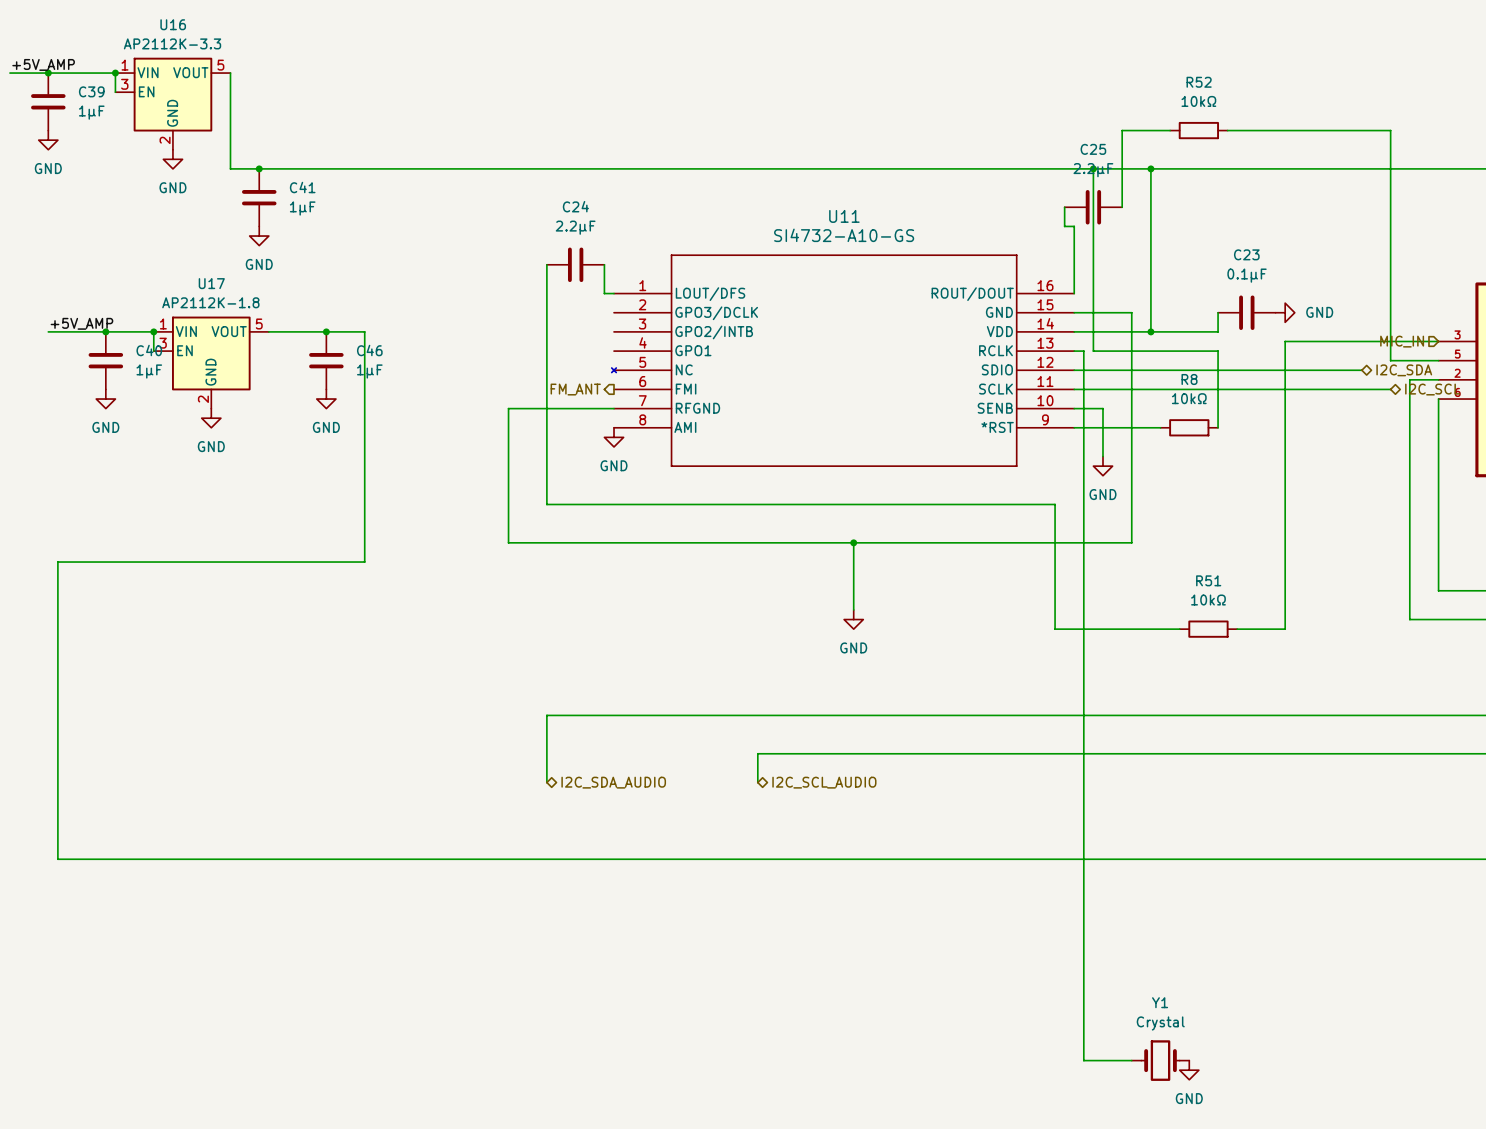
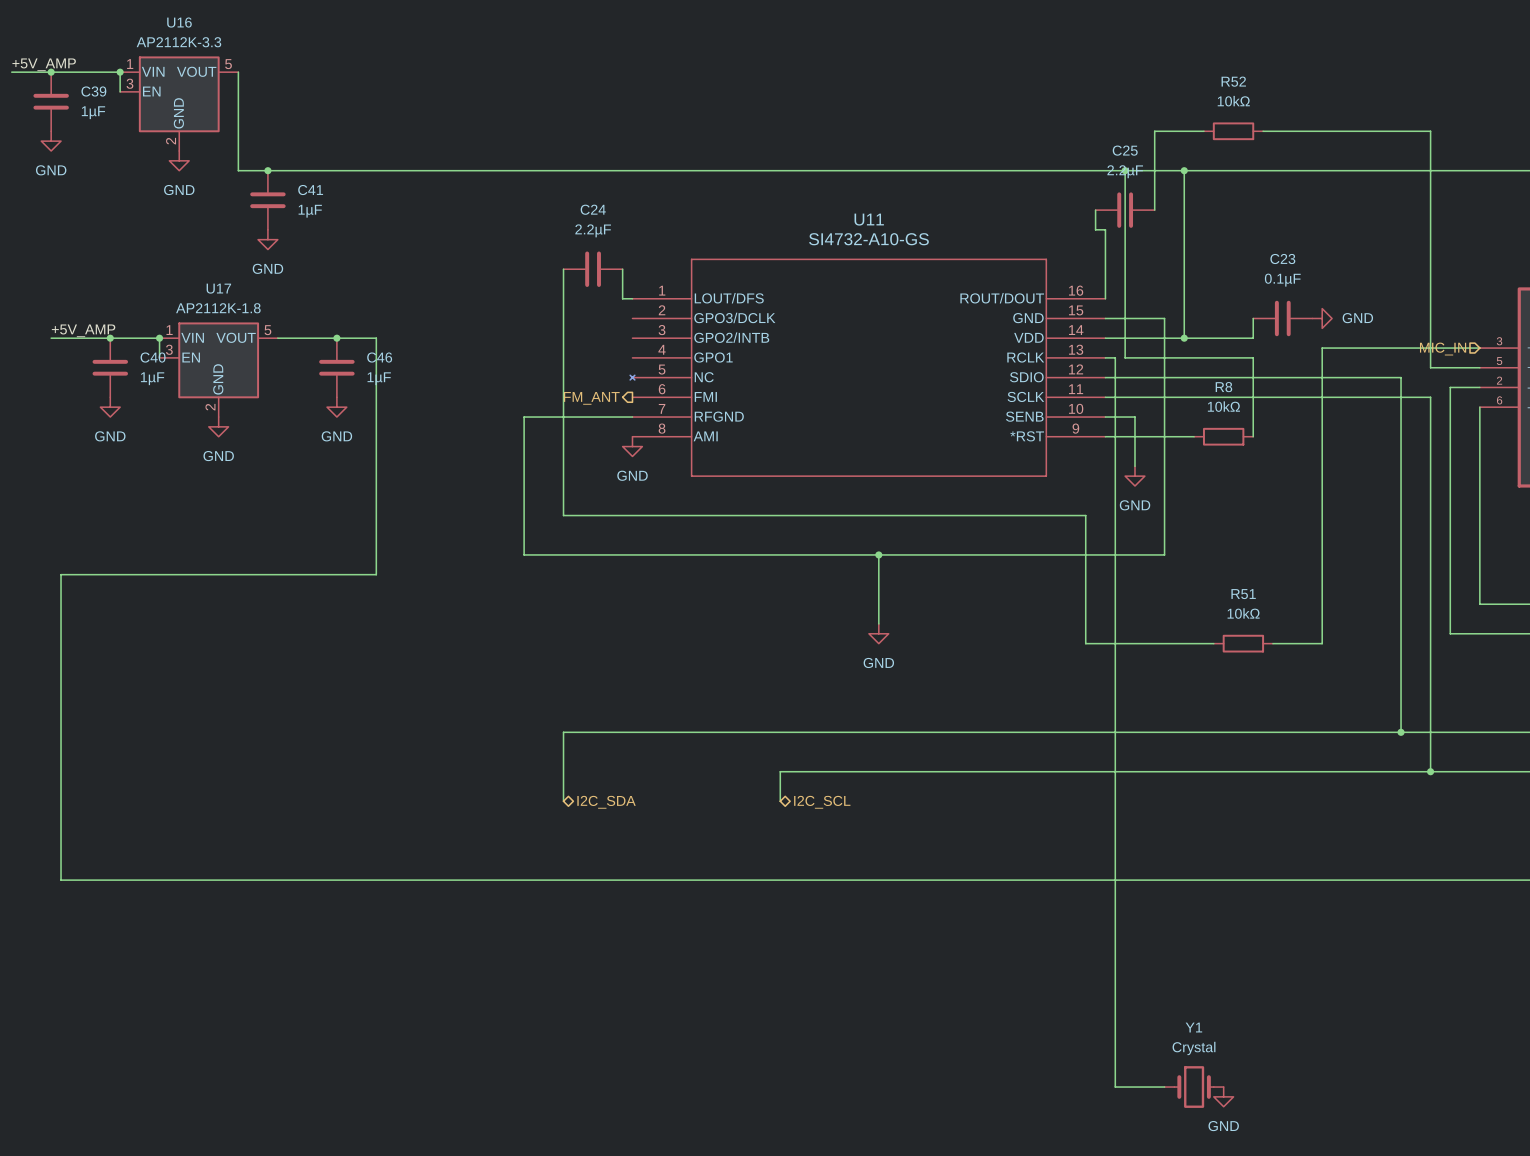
wire: none -> (1401, 377) (1401, 732)
hierarchical label: I2C_SDA (1404, 370) -> none
wire: none -> (1430, 397) (1430, 771)
hierarchical label: I2C_SCL (1432, 389) -> none
junction: none -> (1401, 732)
junction: none -> (1430, 771)
hierarchical label: I2C_SDA_AUDIO (613, 782) -> I2C_SDA (606, 802)
hierarchical label: I2C_SCL_AUDIO (824, 782) -> I2C_SCL (822, 802)

